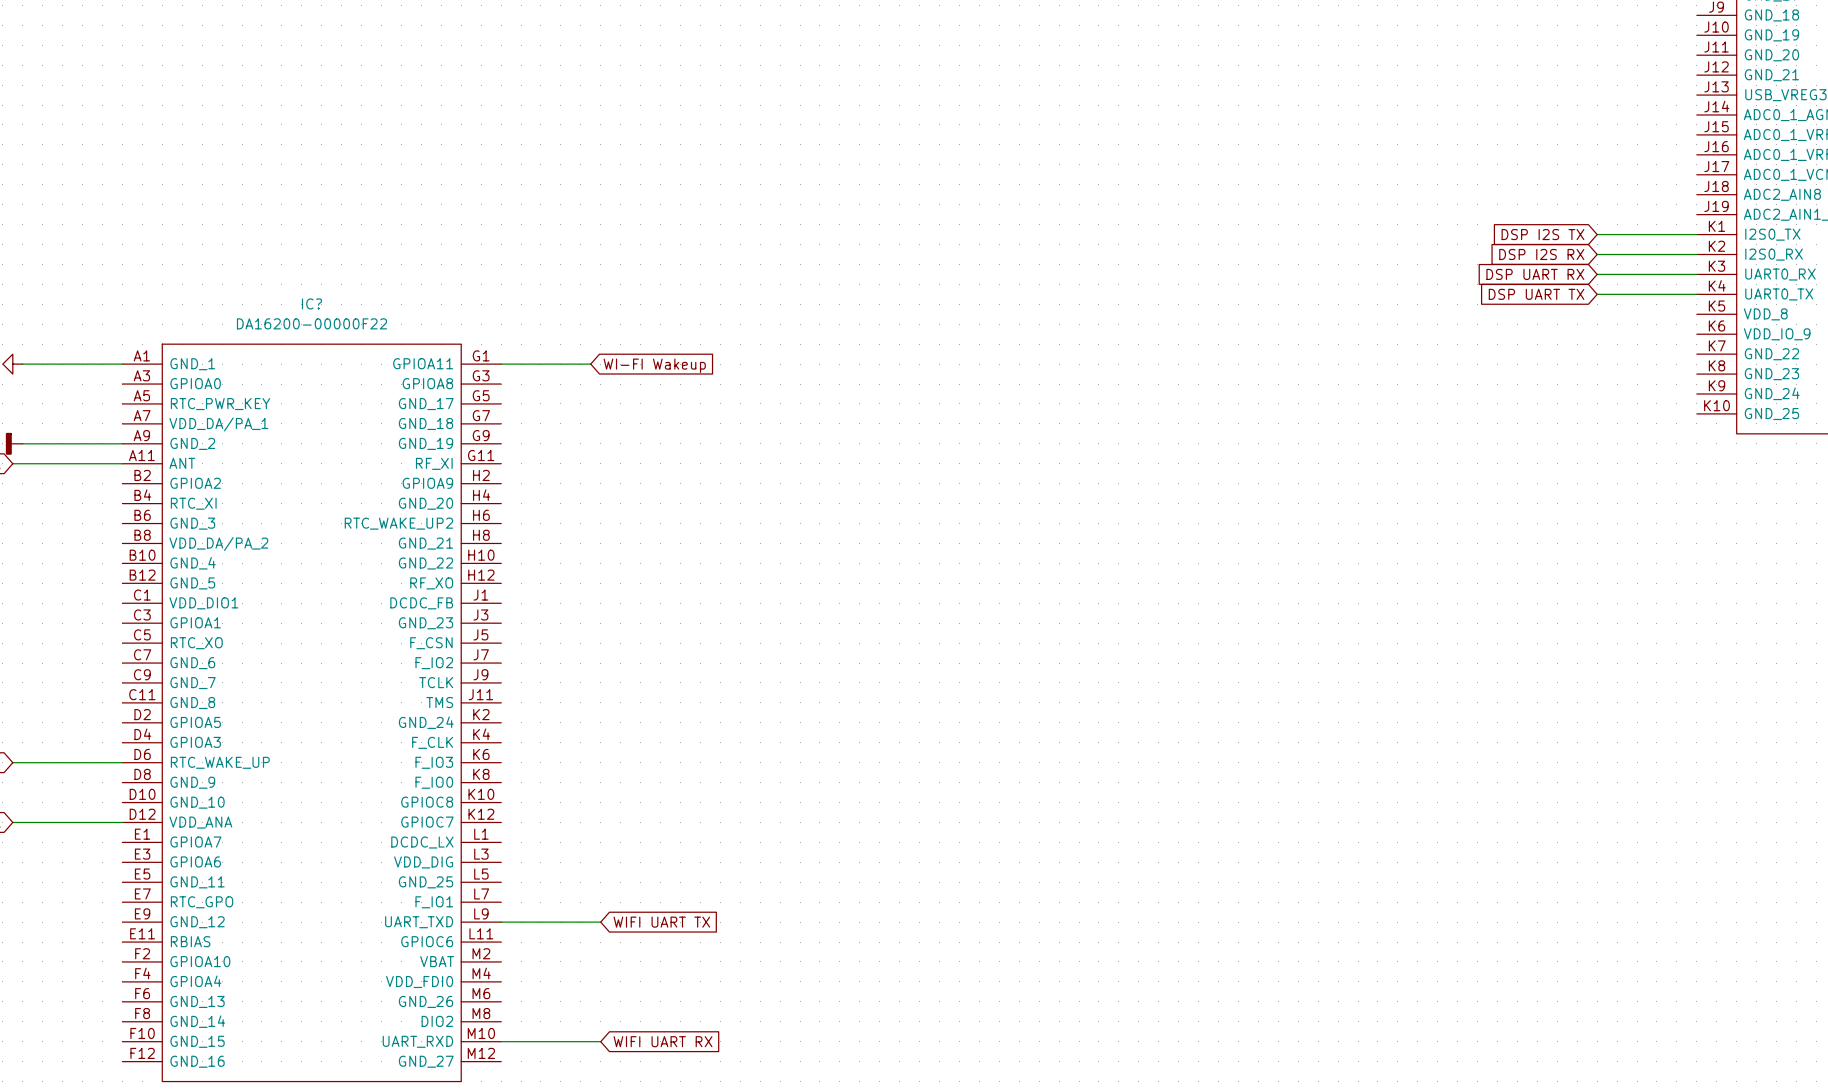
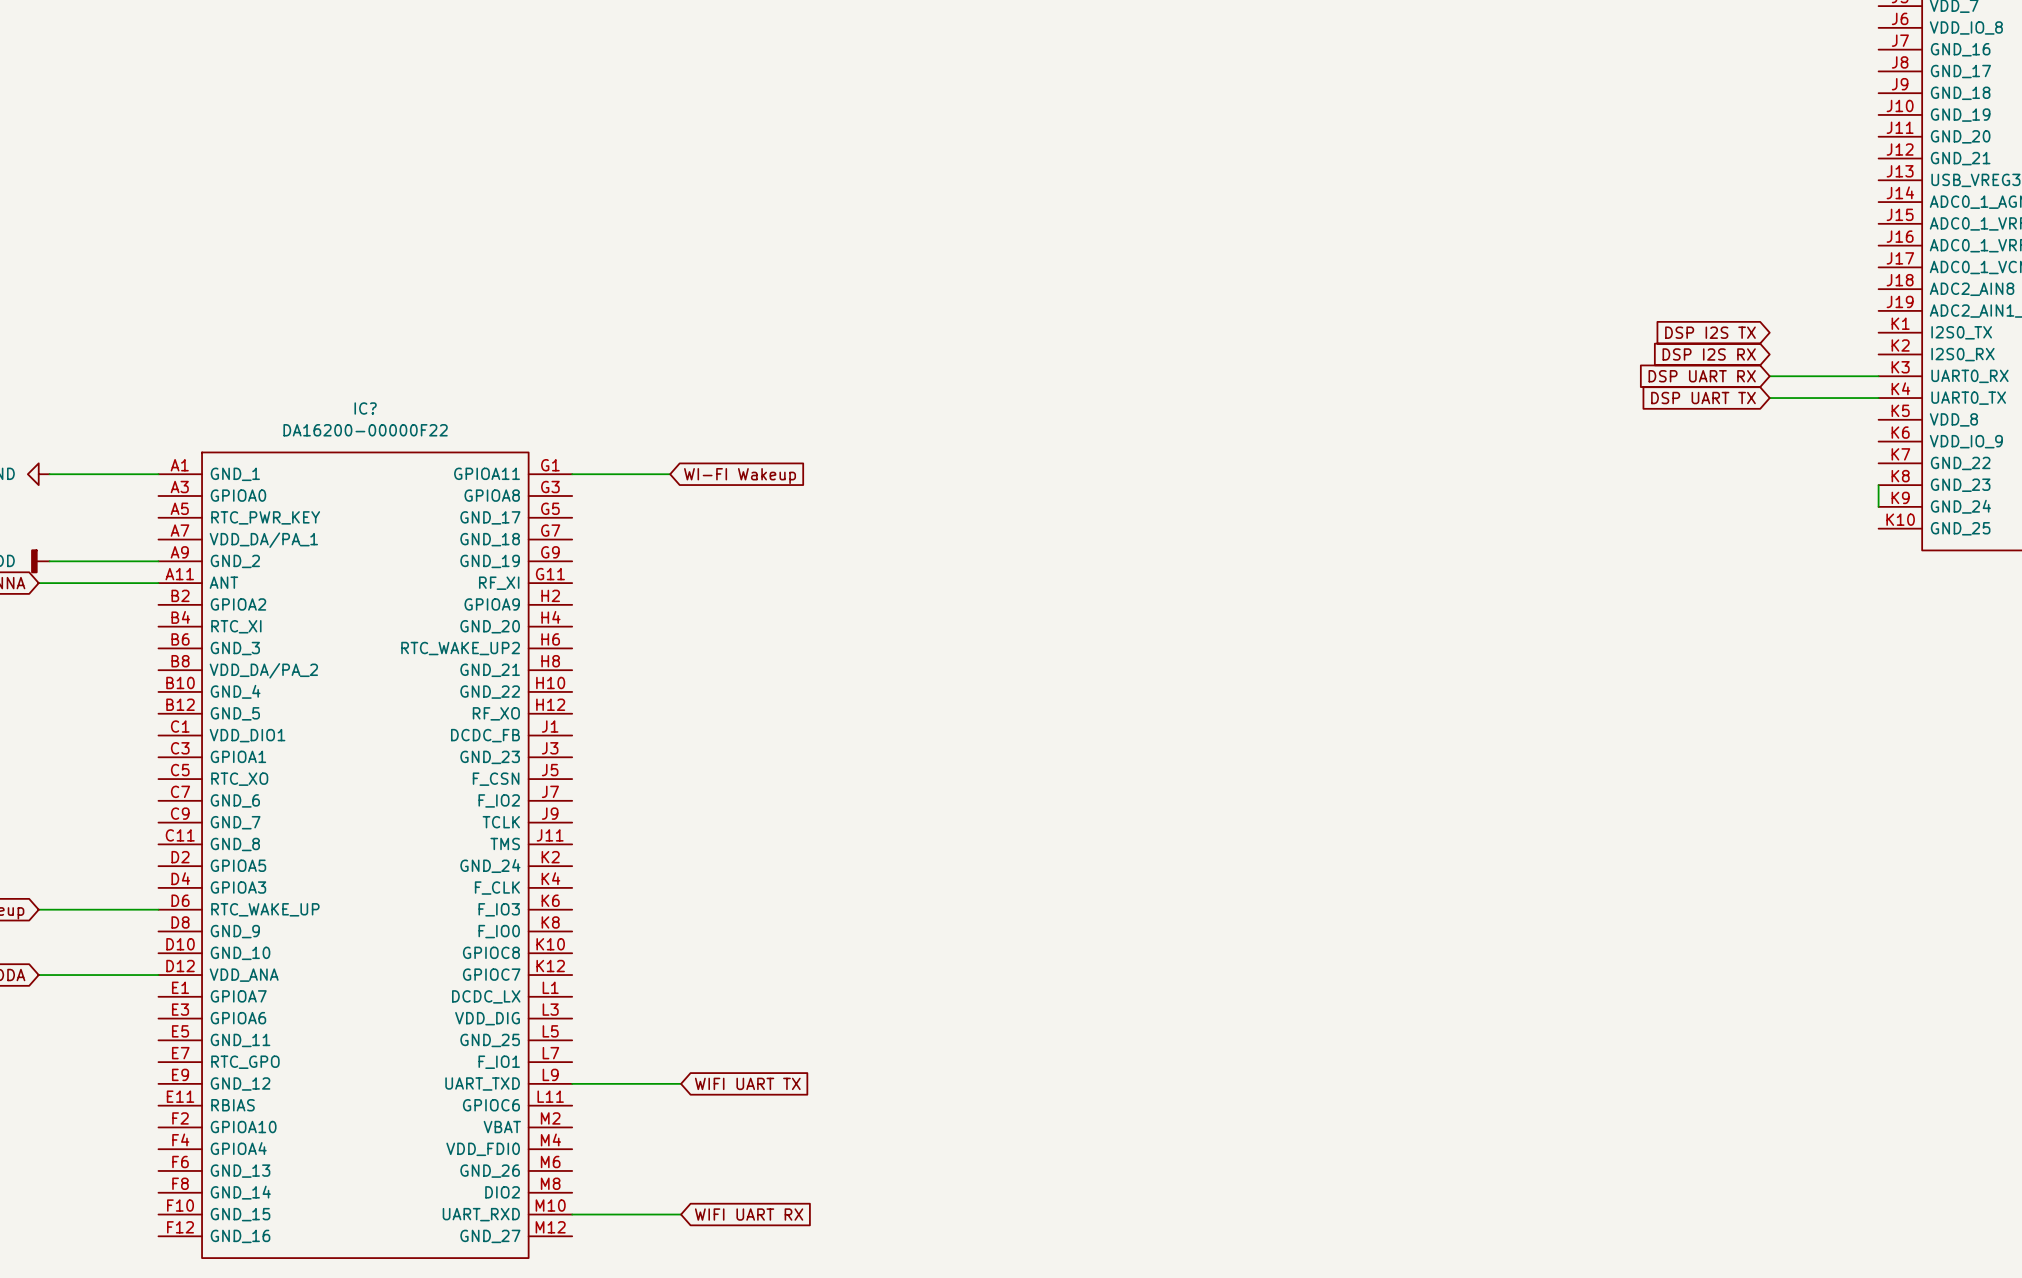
wire: (1597, 234) (1696, 234) -> none
wire: (1597, 254) (1696, 254) -> none
wire: none -> (1878, 485) (1878, 506)

